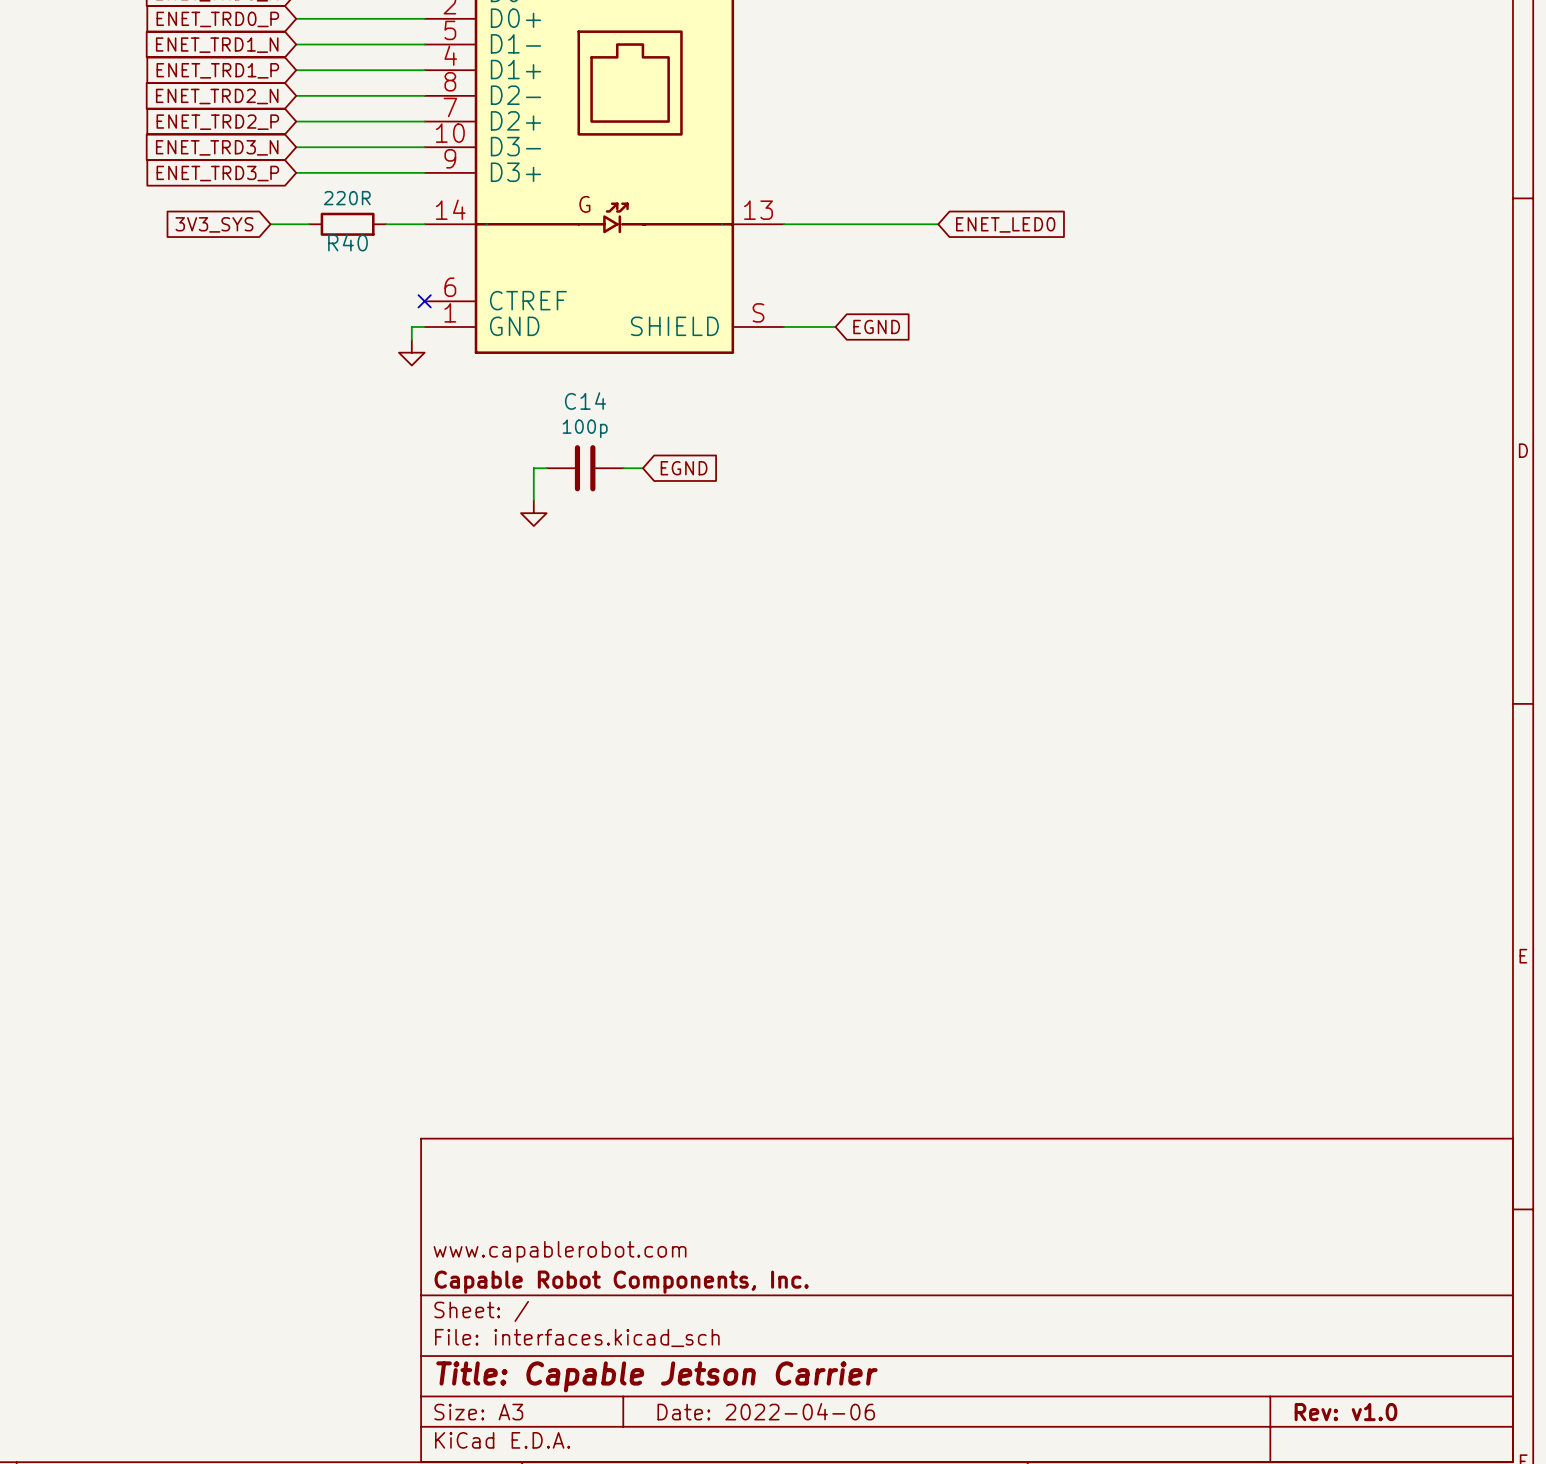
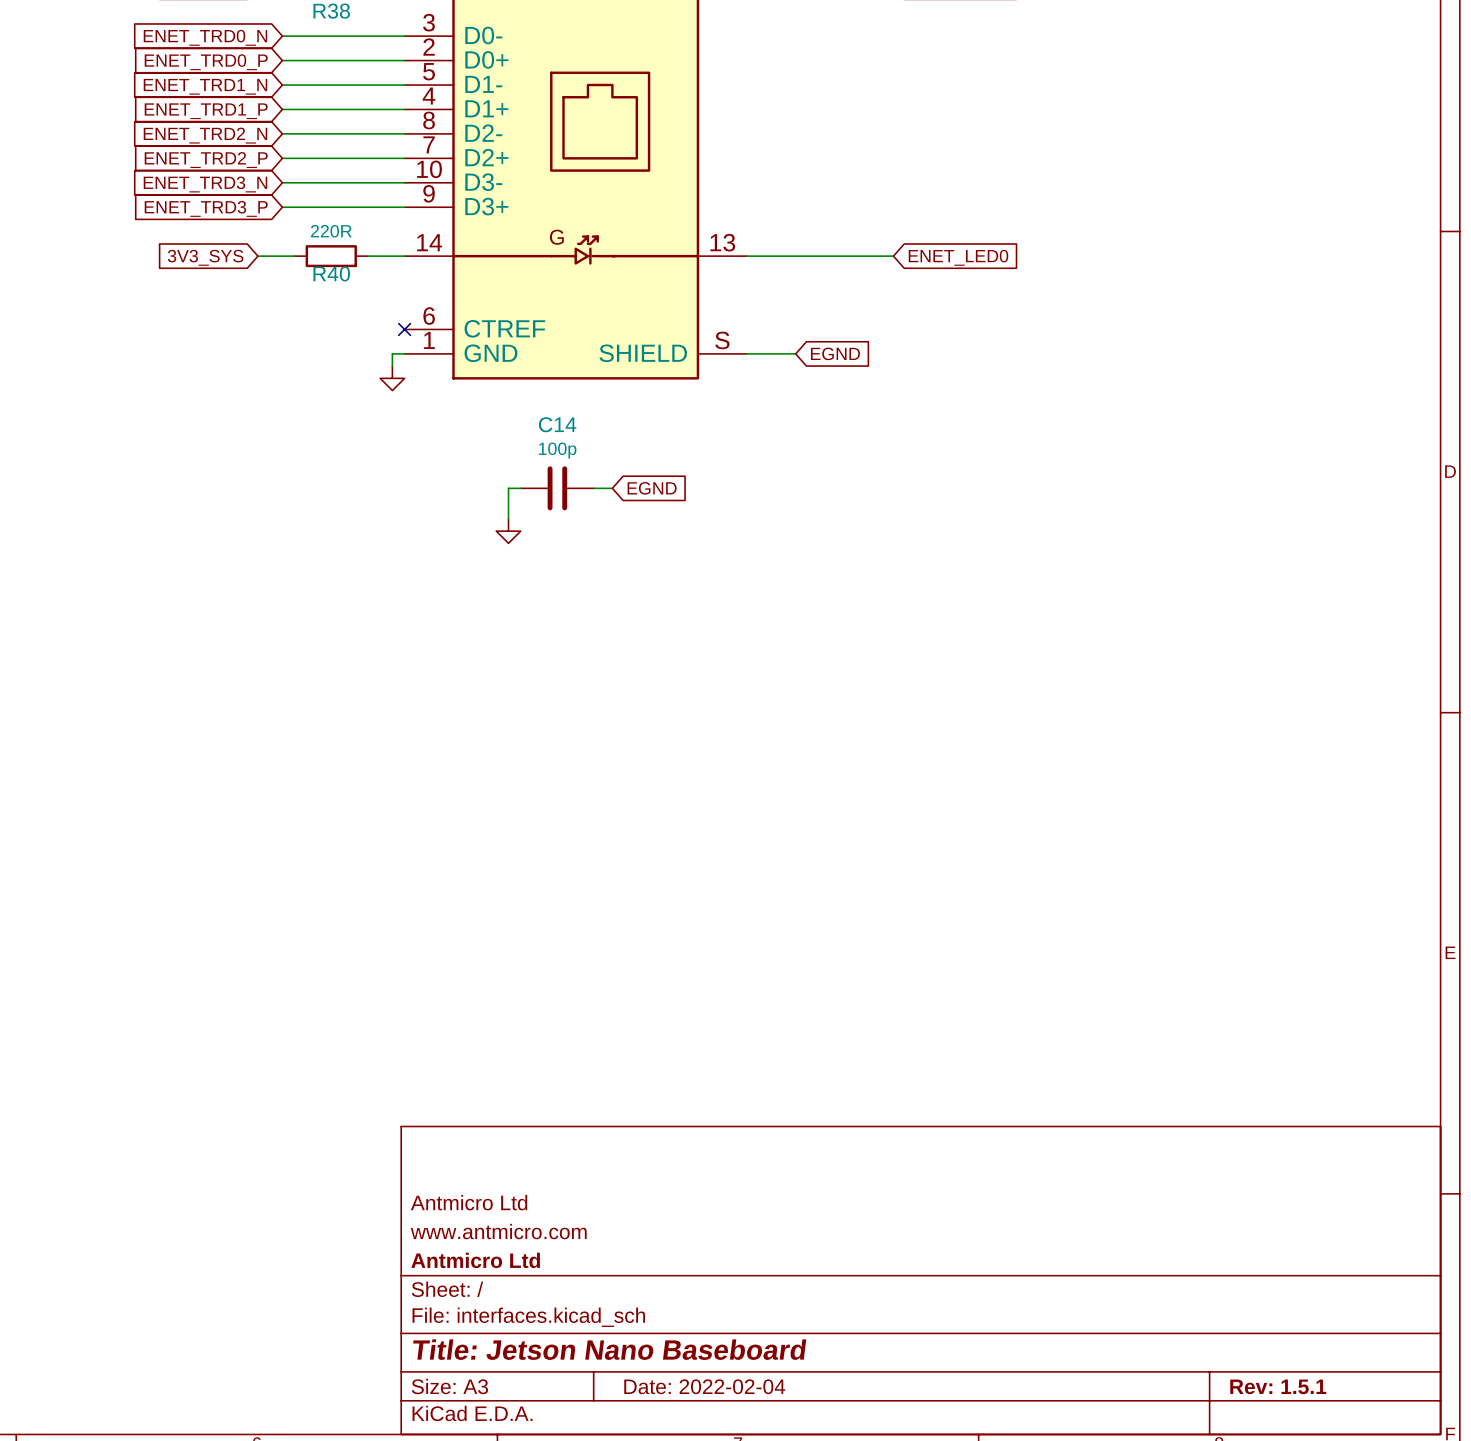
title block: none -> Antmicro Ltd (469, 1202)
title block: www.capablerobot.com (560, 1251) -> www.antmicro.com (498, 1231)
title block: Capable Robot Components, Inc. (621, 1282) -> Antmicro Ltd (475, 1260)
title block: Title: Capable Jetson Carrier (656, 1376) -> Title: Jetson Nano Baseboard (609, 1349)
title block: Date: 2022-04-06 (766, 1411) -> Date: 2022-02-04 (704, 1386)
title block: Rev: v1.0 (1345, 1412) -> Rev: 1.5.1 (1278, 1386)

